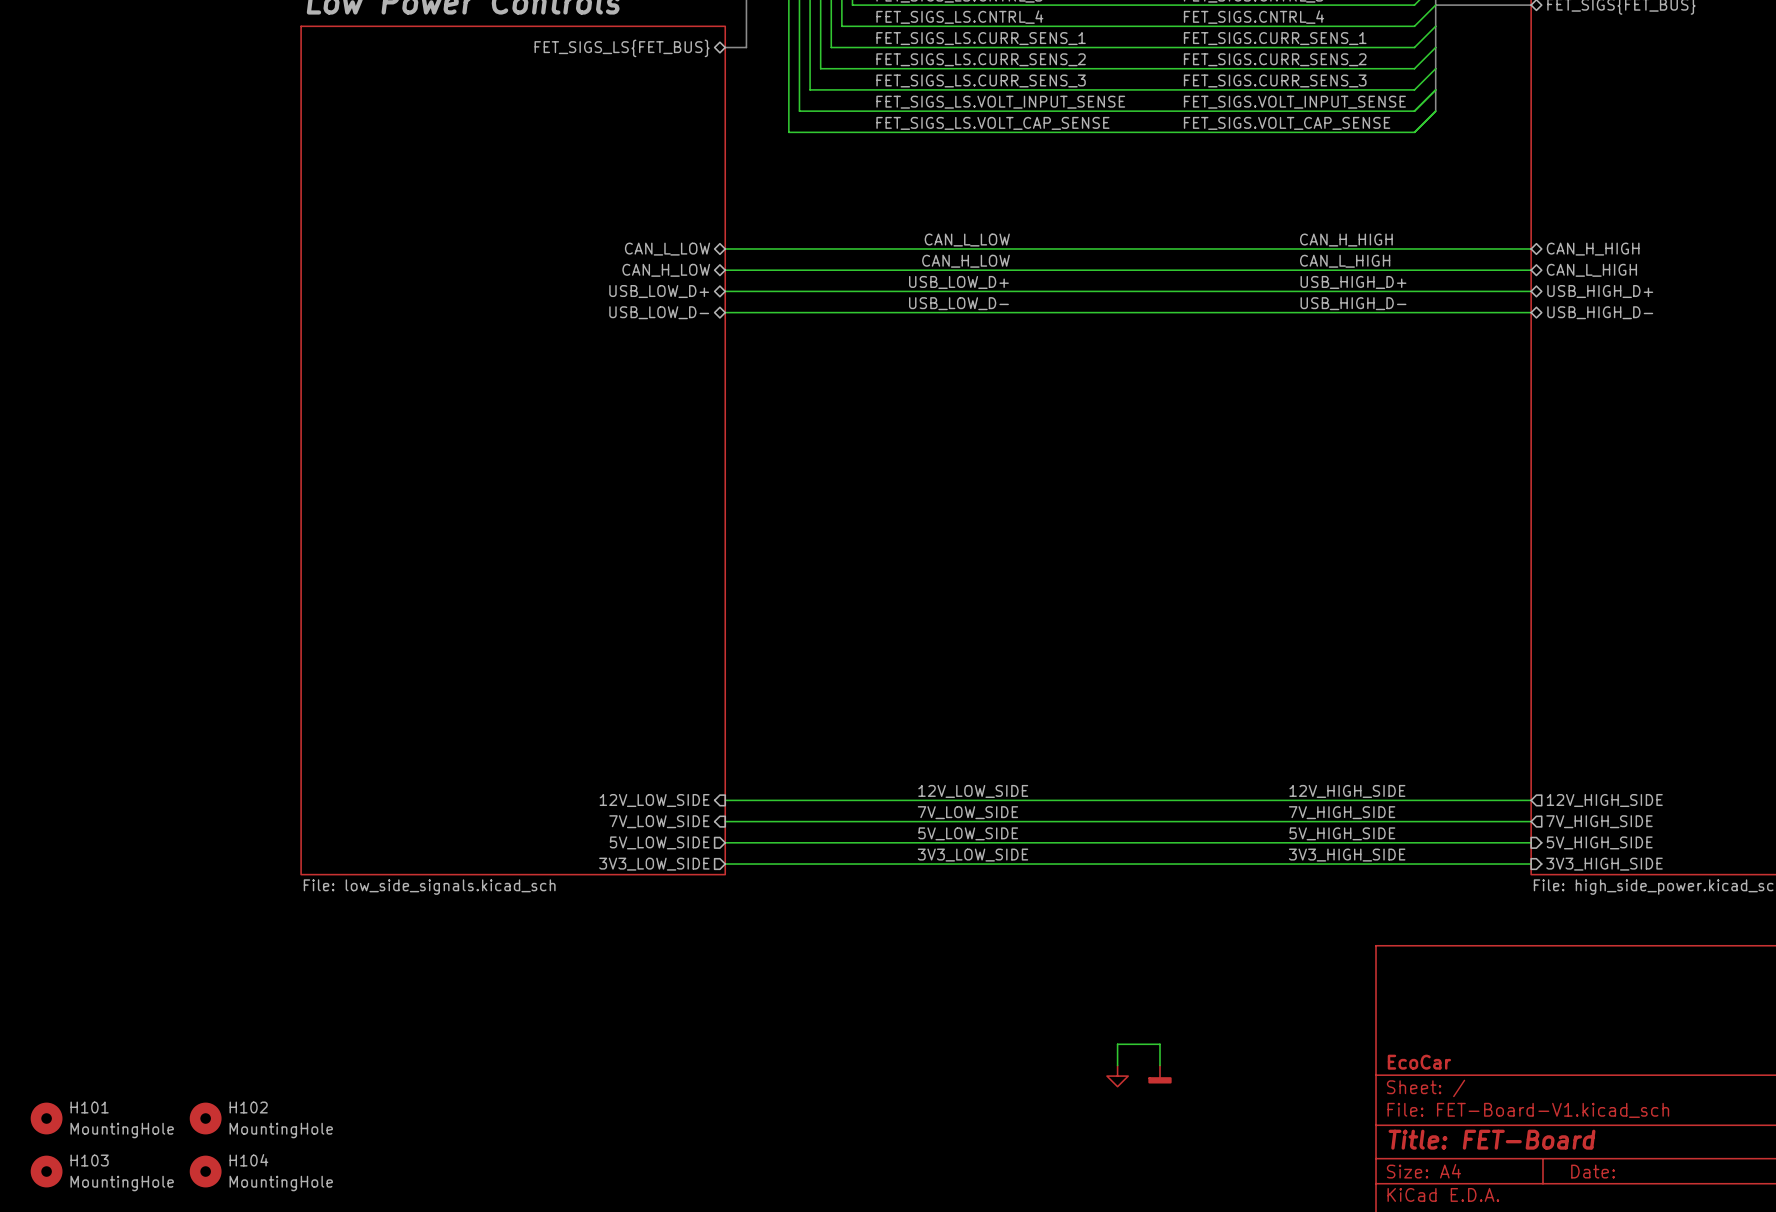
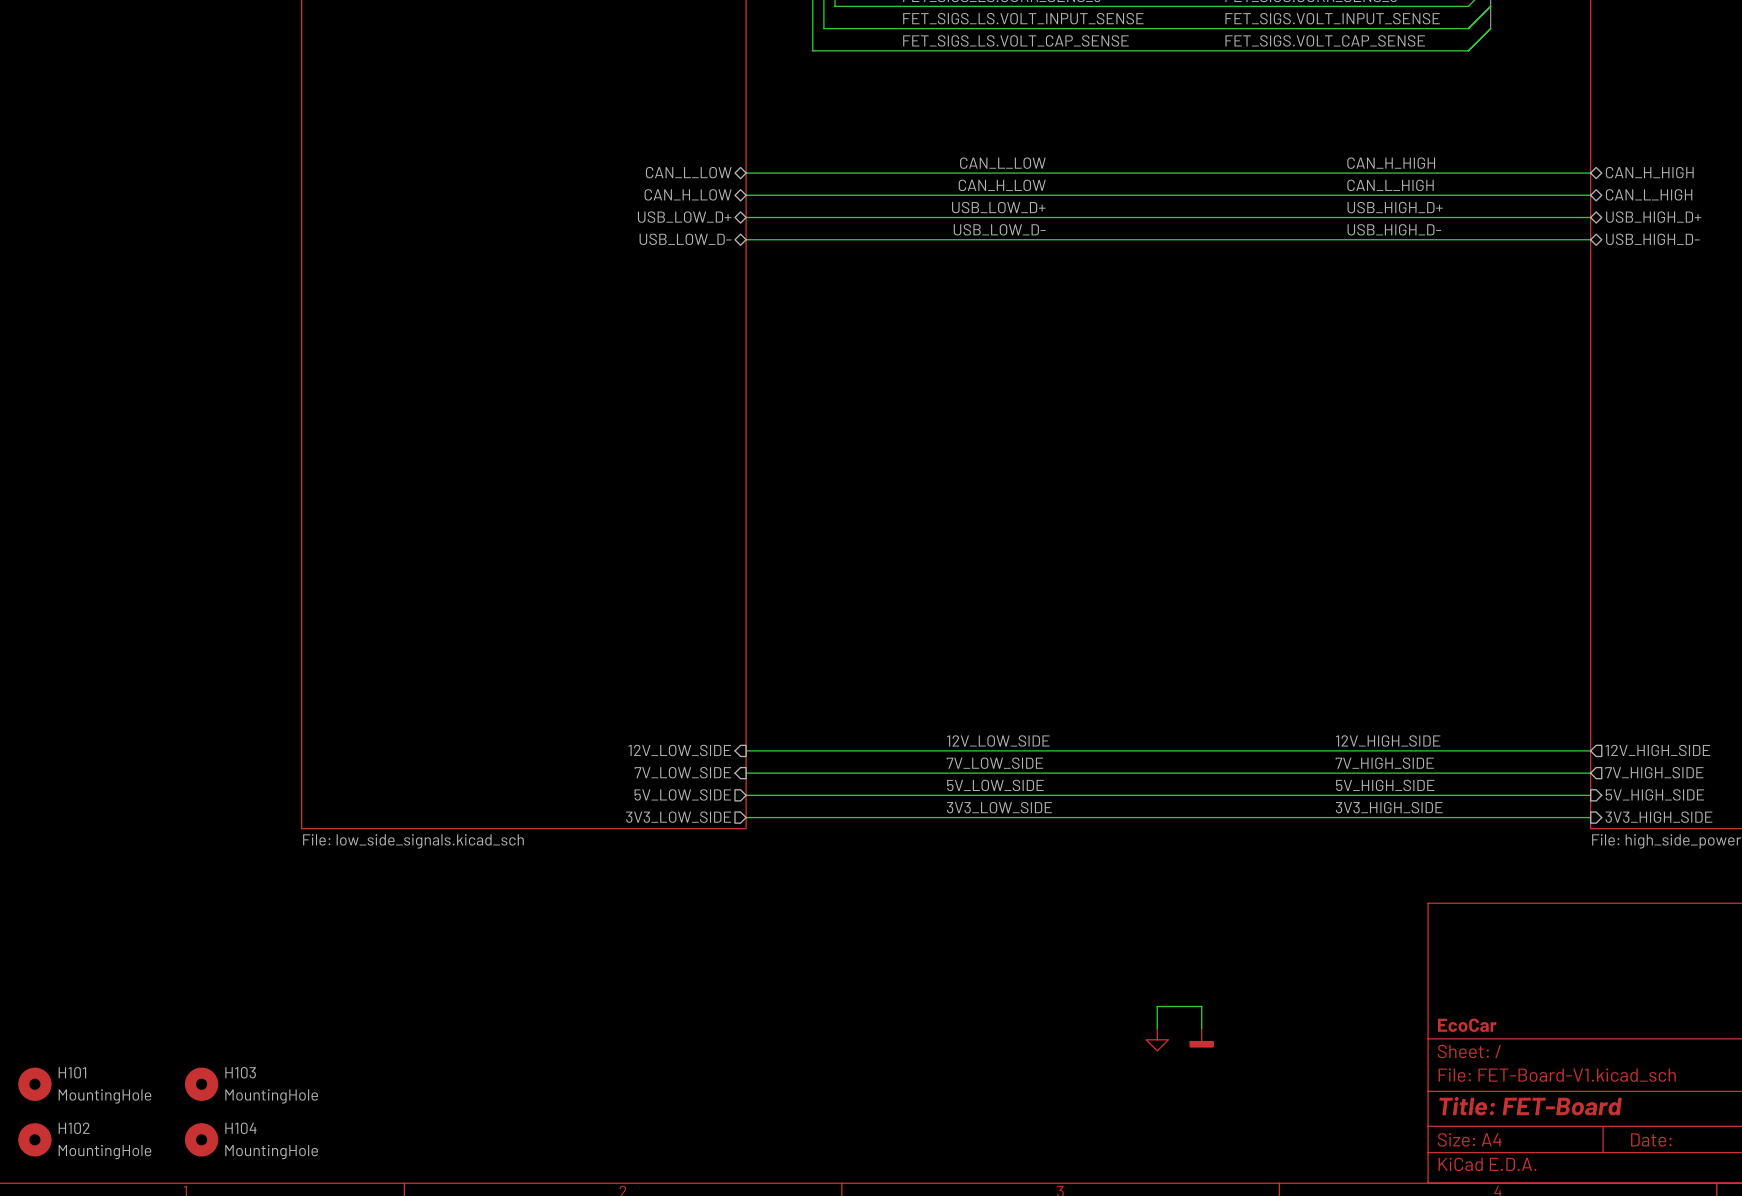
H102 name: H102 (248, 1107) -> H103 (240, 1072)
H103 name: H103 (89, 1160) -> H102 (74, 1128)

